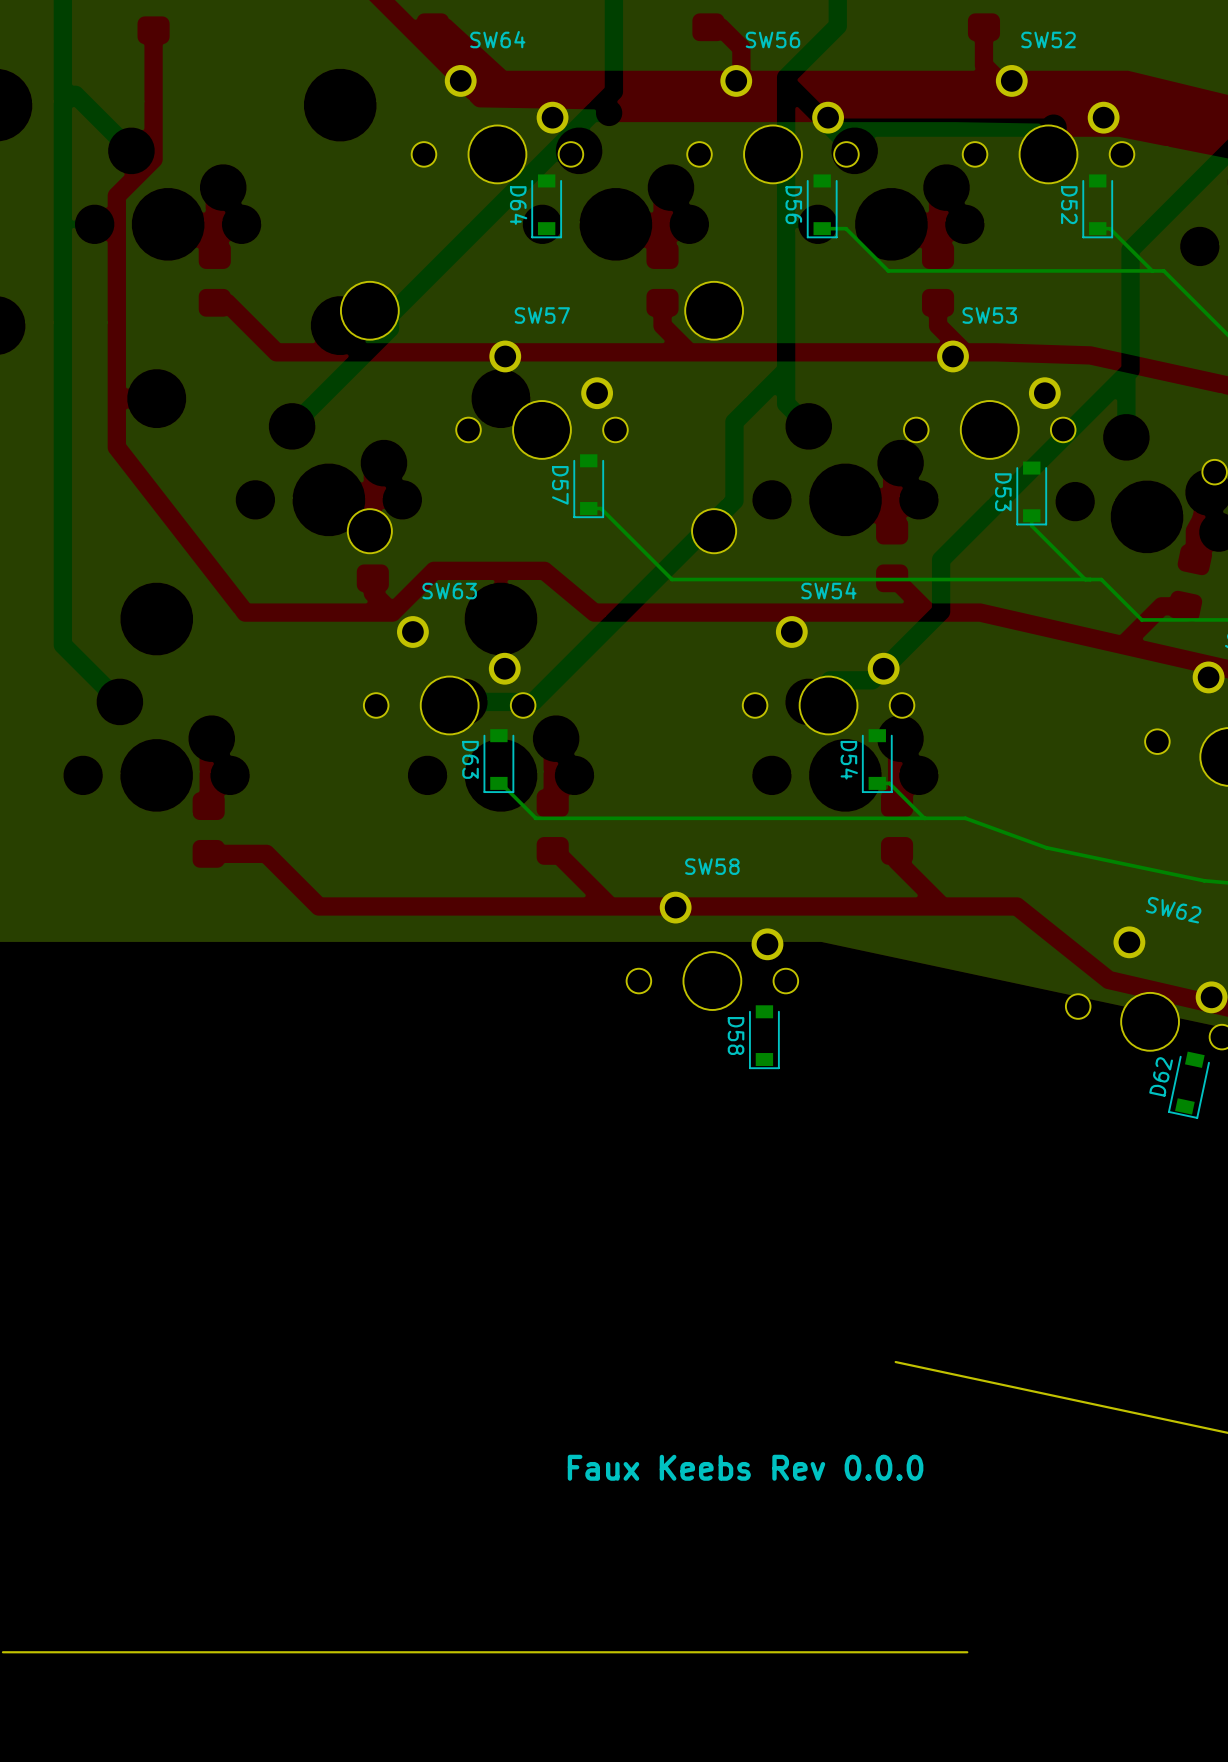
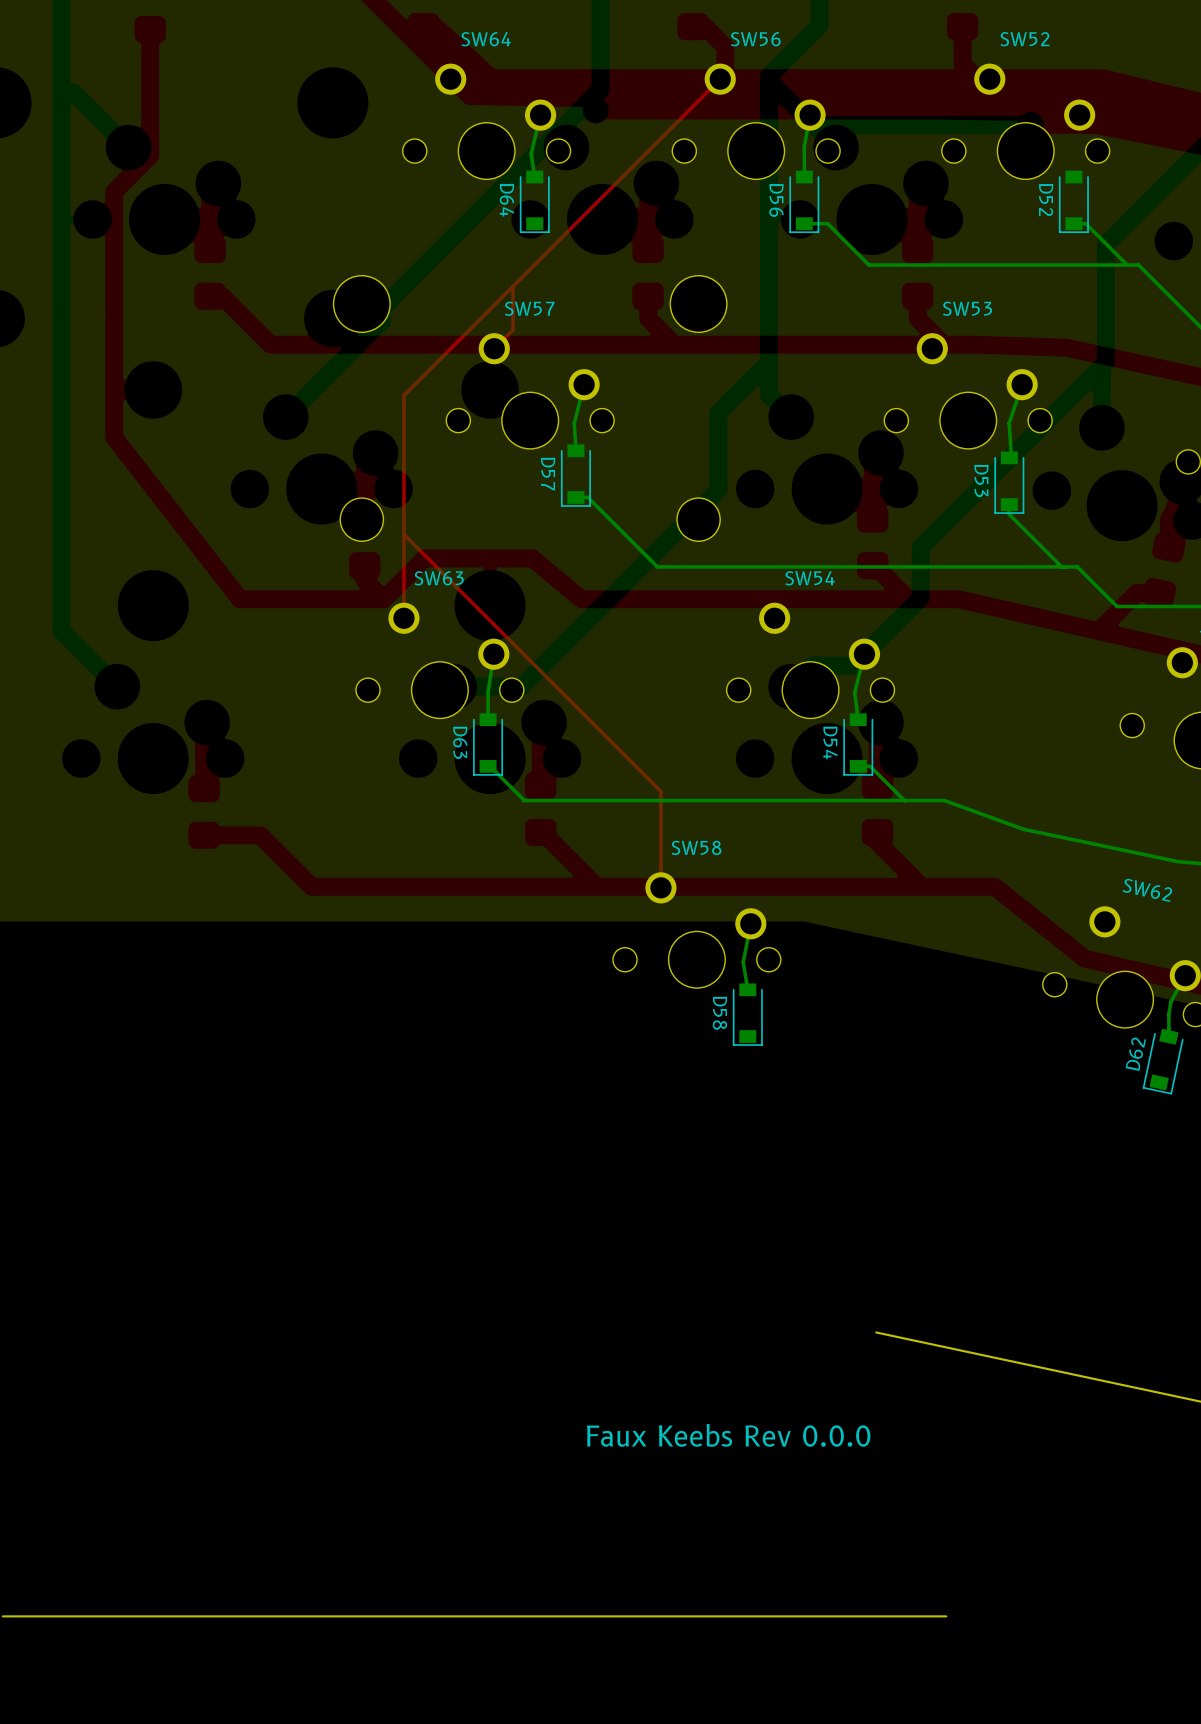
top track: none -> (720, 79) (403, 395) (403, 618)
bottom track: none -> (540, 115) (531, 153) (534, 177)
bottom track: none -> (810, 115) (804, 146) (804, 177)
top track: none -> (513, 286) (513, 329) (494, 348)
bottom track: none -> (584, 384) (574, 423) (575, 450)
bottom track: none -> (1022, 384) (1009, 423) (1011, 457) (1009, 457)
top track: none -> (403, 534) (660, 791) (660, 887)
bottom track: none -> (493, 654) (488, 692) (488, 719)
bottom track: none -> (864, 654) (854, 692) (858, 719)
bottom track: none -> (750, 923) (743, 962) (747, 989)
bottom track: none -> (1185, 975) (1170, 1001) (1168, 1036)

